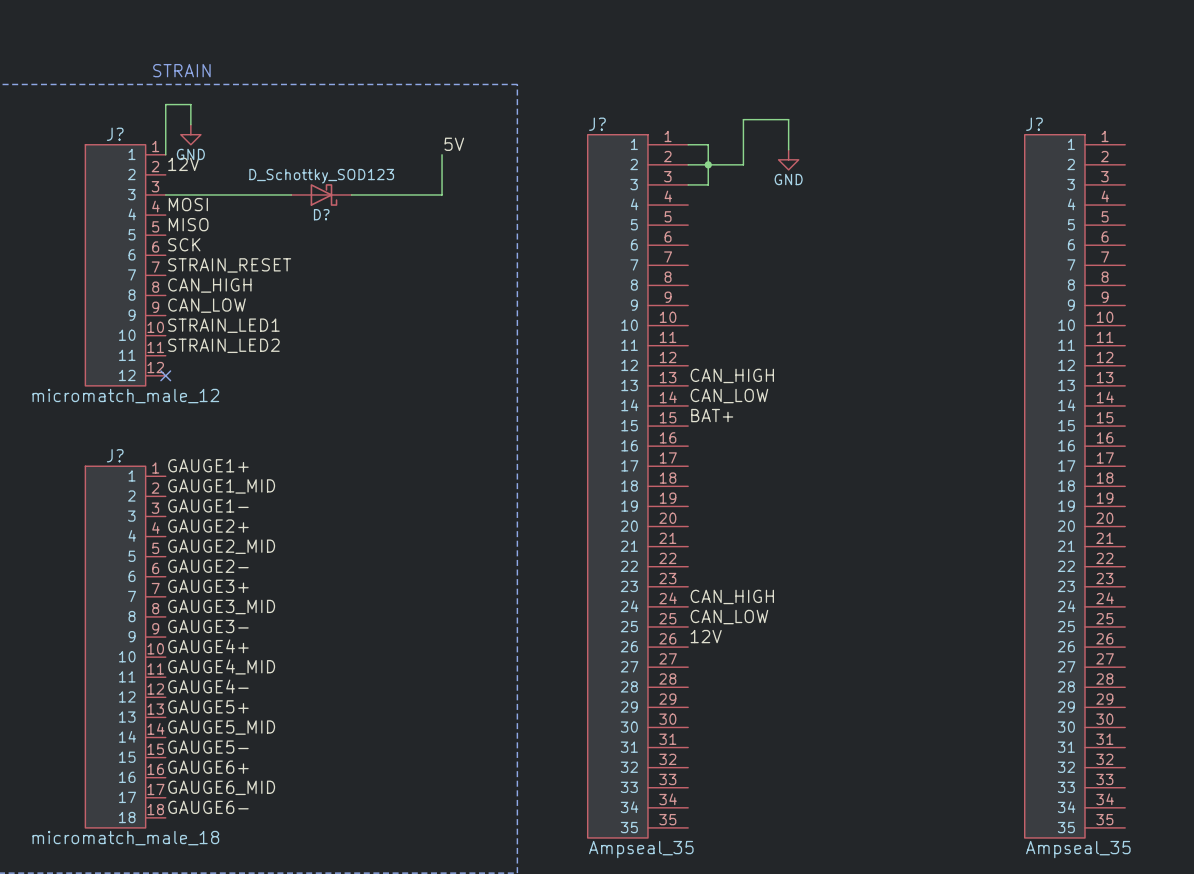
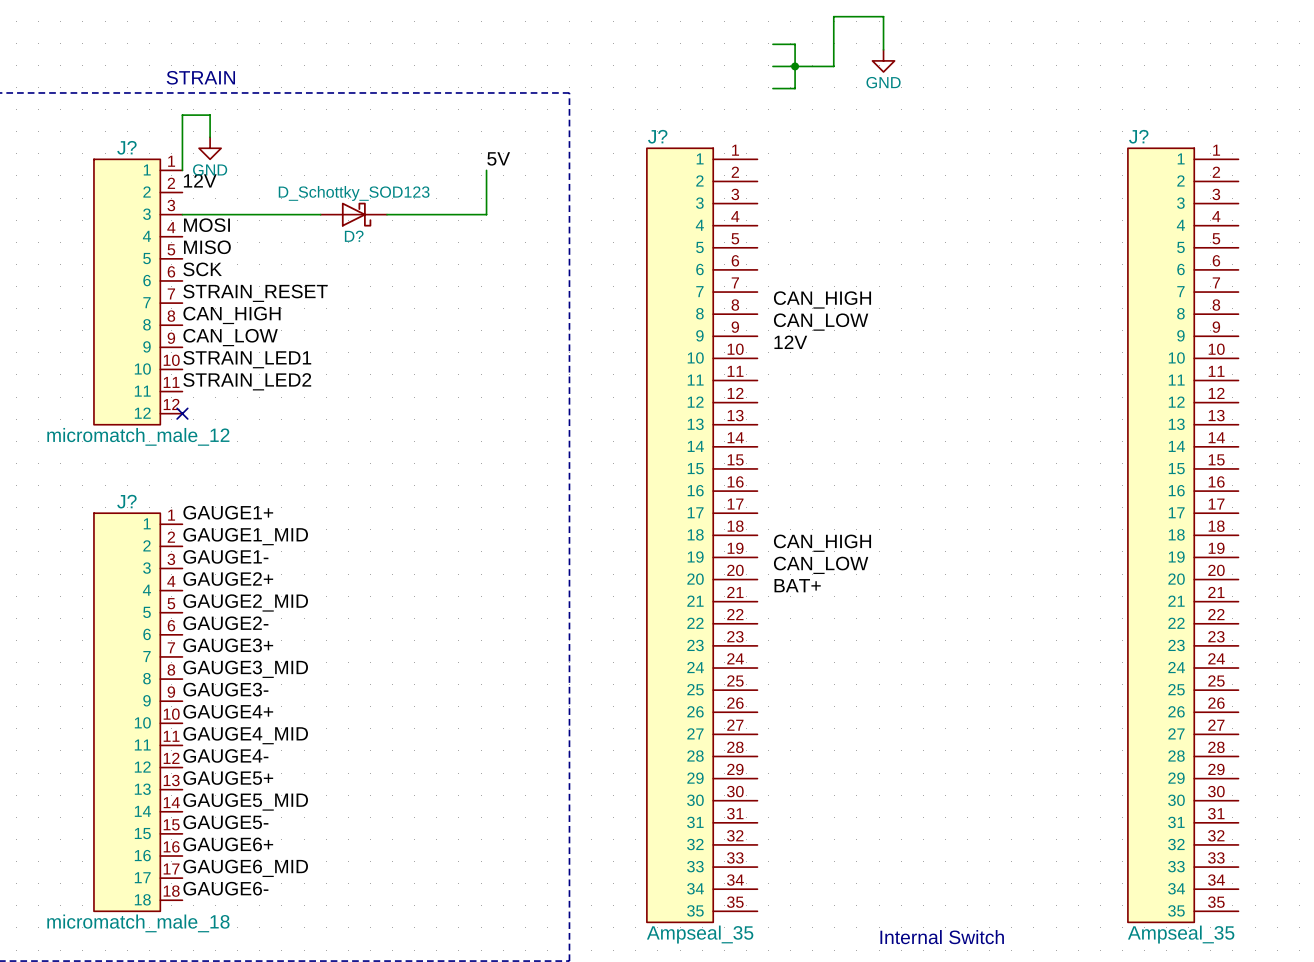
junction: none -> (795, 66)
wire: (688, 144) (708, 144) (708, 184) (688, 184) -> (772, 44) (795, 44) (795, 88) (772, 88)
wire: (788, 149) (788, 119) (743, 119) (743, 164) (688, 164) -> (883, 49) (883, 16) (833, 16) (833, 66) (772, 66)
power symbol position: GND (788, 159) -> GND (883, 60)
junction: (708, 164) -> none
label: none -> CAN_HIGH (822, 299)
label: none -> CAN_LOW (821, 322)
label: none -> 12V (790, 342)
label: CAN_HIGH (732, 375) -> none
label: CAN_LOW (729, 396) -> none
label position: BAT+ (712, 415) -> BAT+ (797, 585)
label: none -> CAN_HIGH (822, 543)
label: none -> CAN_LOW (821, 565)
label: CAN_HIGH (732, 596) -> none
label: CAN_LOW (729, 617) -> none
label: 12V (706, 636) -> none
text: none -> Internal Switch (942, 937)

